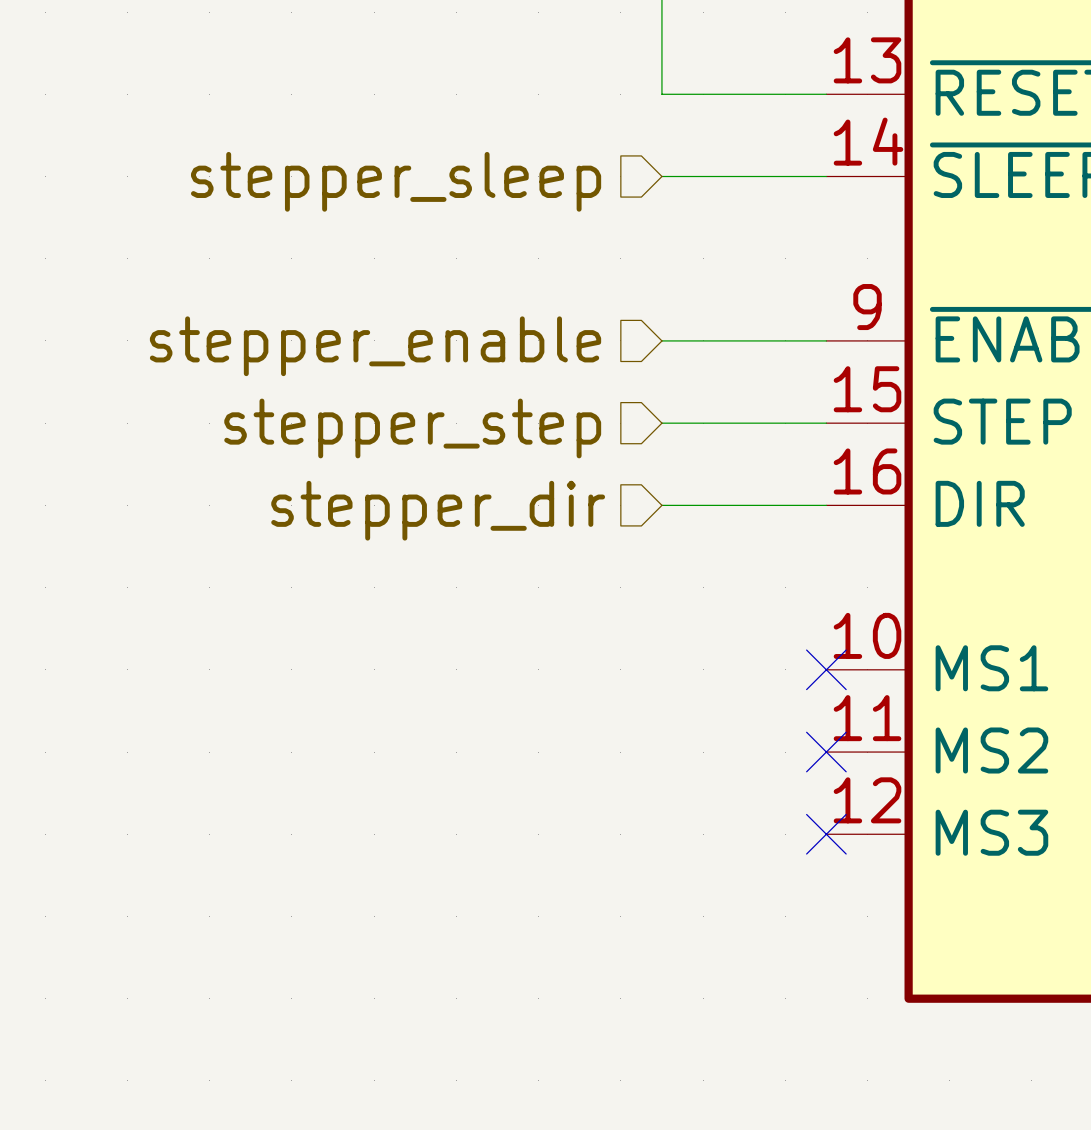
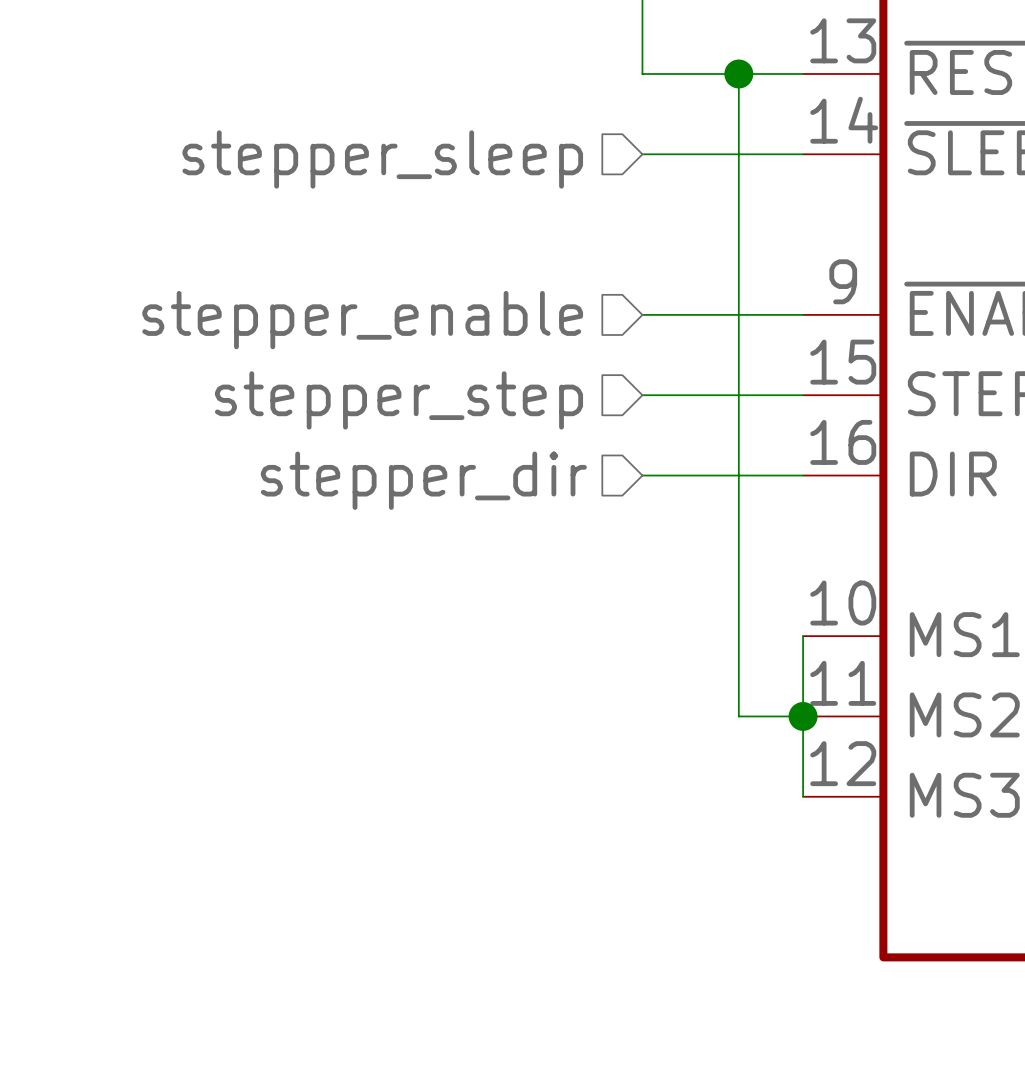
wire: none -> (738, 73) (738, 716) (803, 716)
junction: none -> (738, 73)
wire: none -> (803, 636) (803, 796)
no-connect mark: (826, 669) -> none
no-connect mark: (826, 752) -> none
junction: none -> (803, 716)
no-connect mark: (826, 834) -> none

